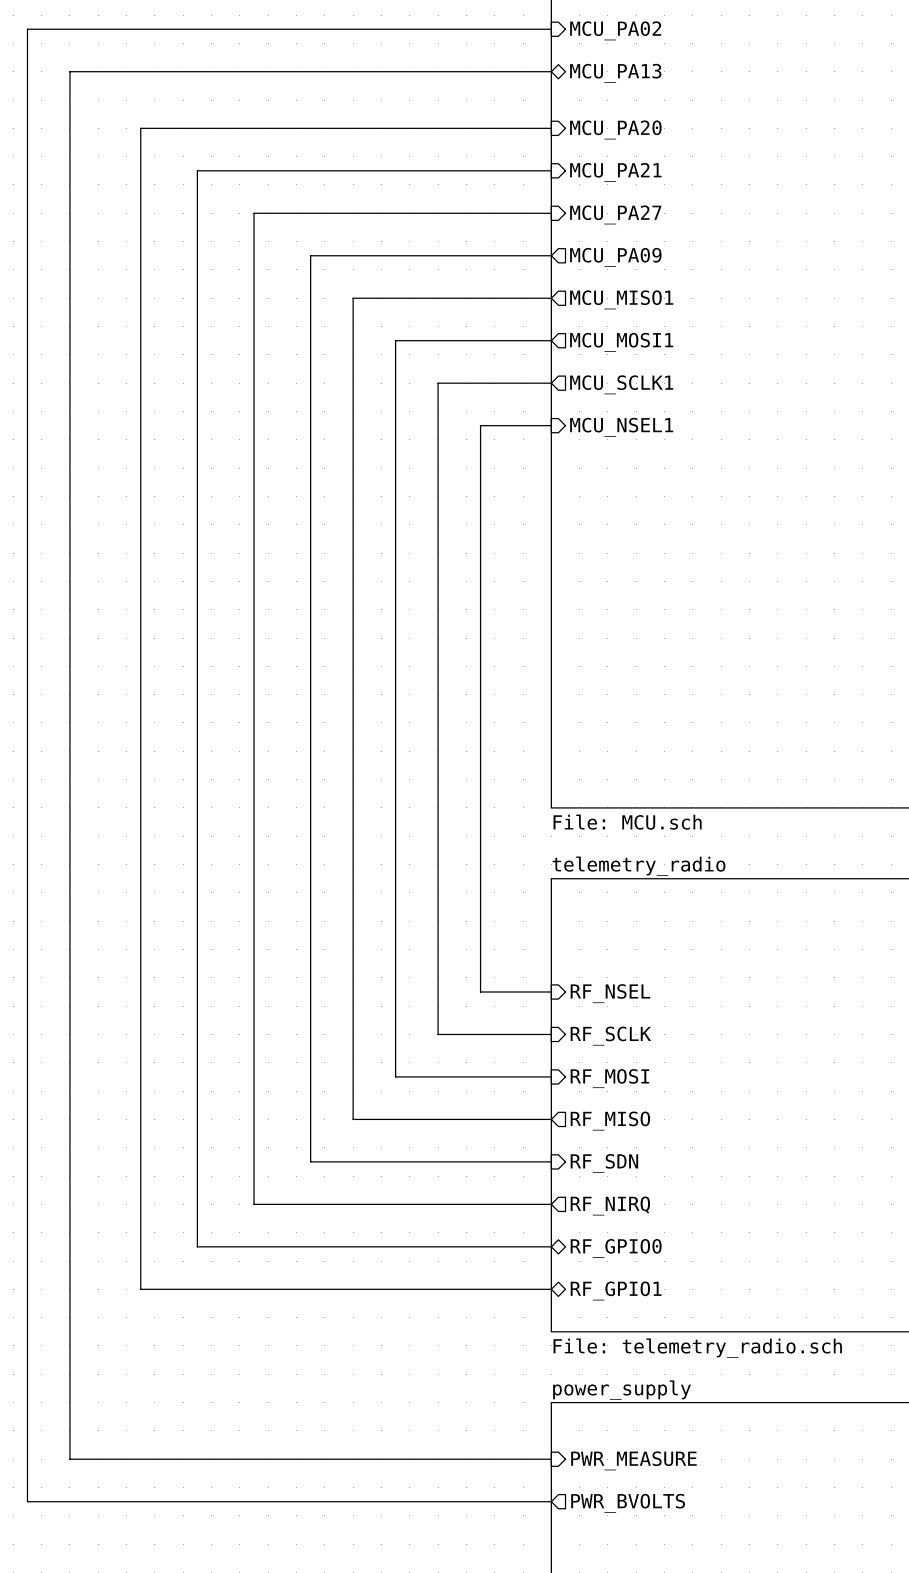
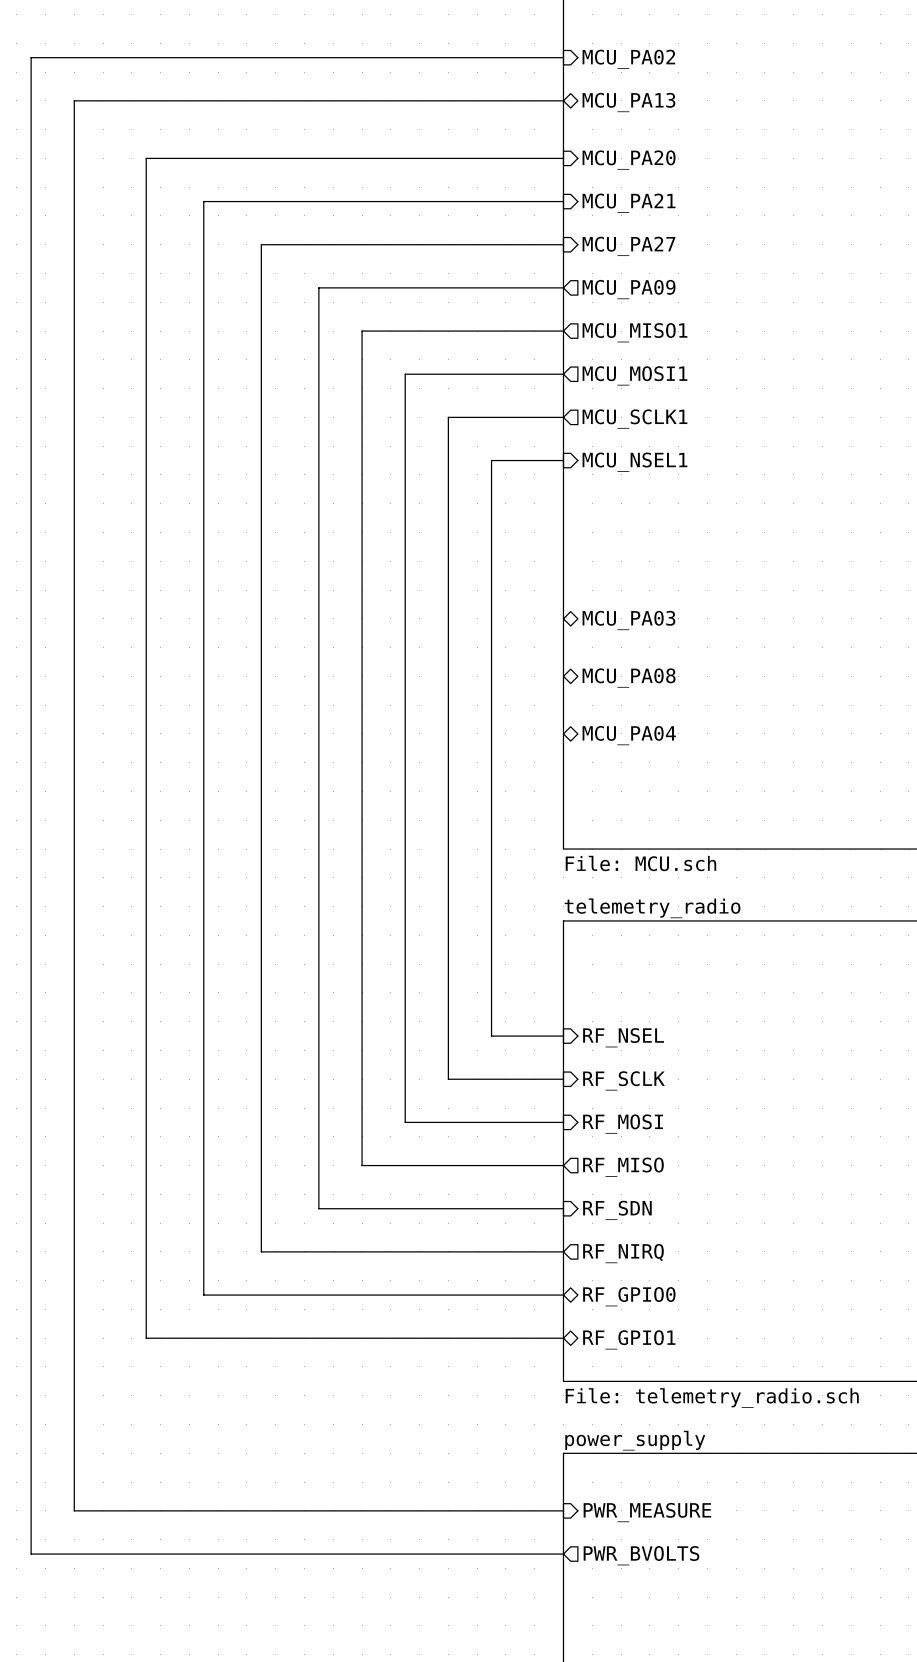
sheet pin: none -> MCU_PA03 (628, 620)
sheet pin: none -> MCU_PA08 (629, 678)
sheet pin: none -> MCU_PA04 (629, 735)

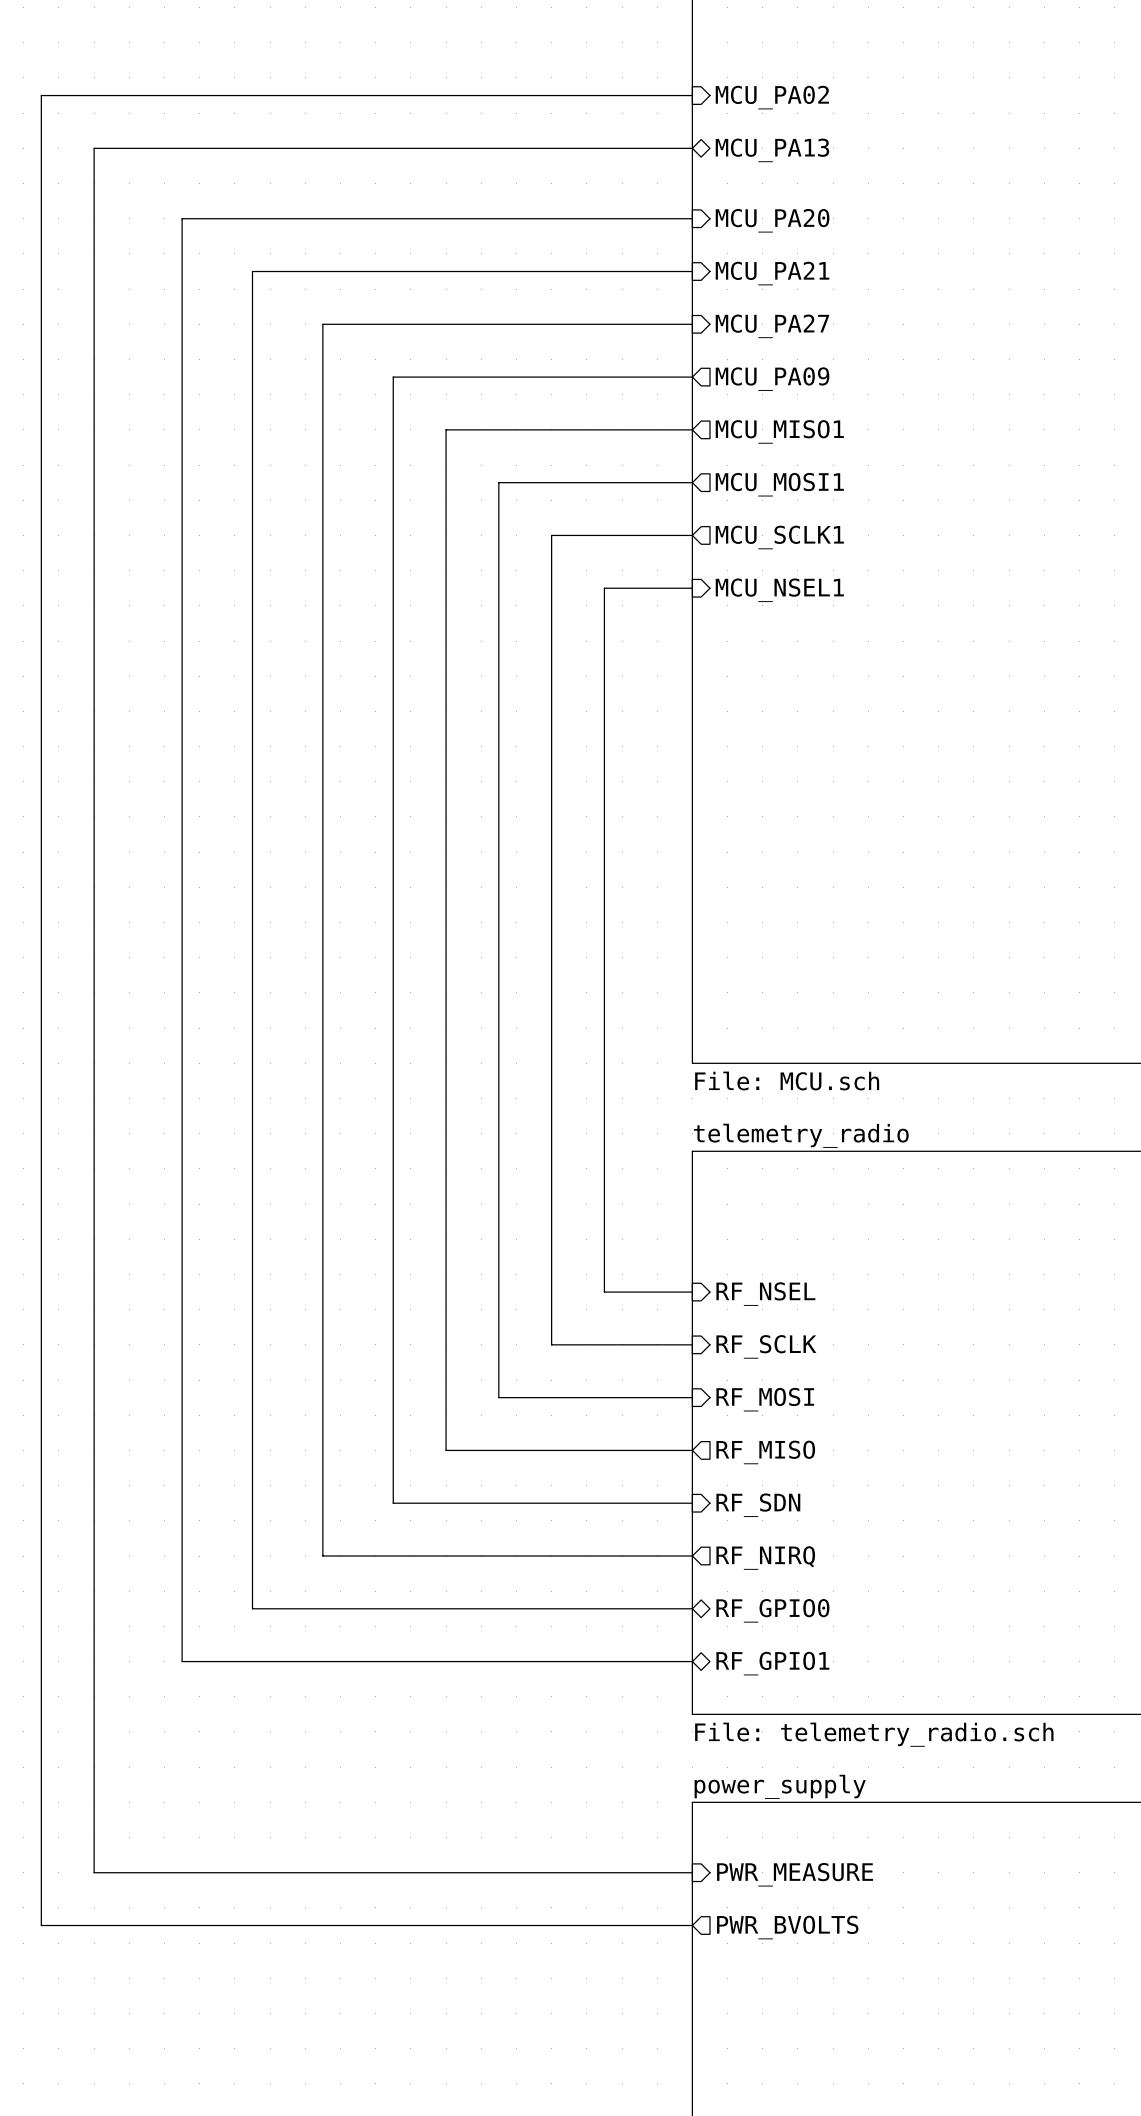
sheet pin: MCU_PA03 (628, 620) -> none
sheet pin: MCU_PA08 (629, 678) -> none
sheet pin: MCU_PA04 (629, 735) -> none

